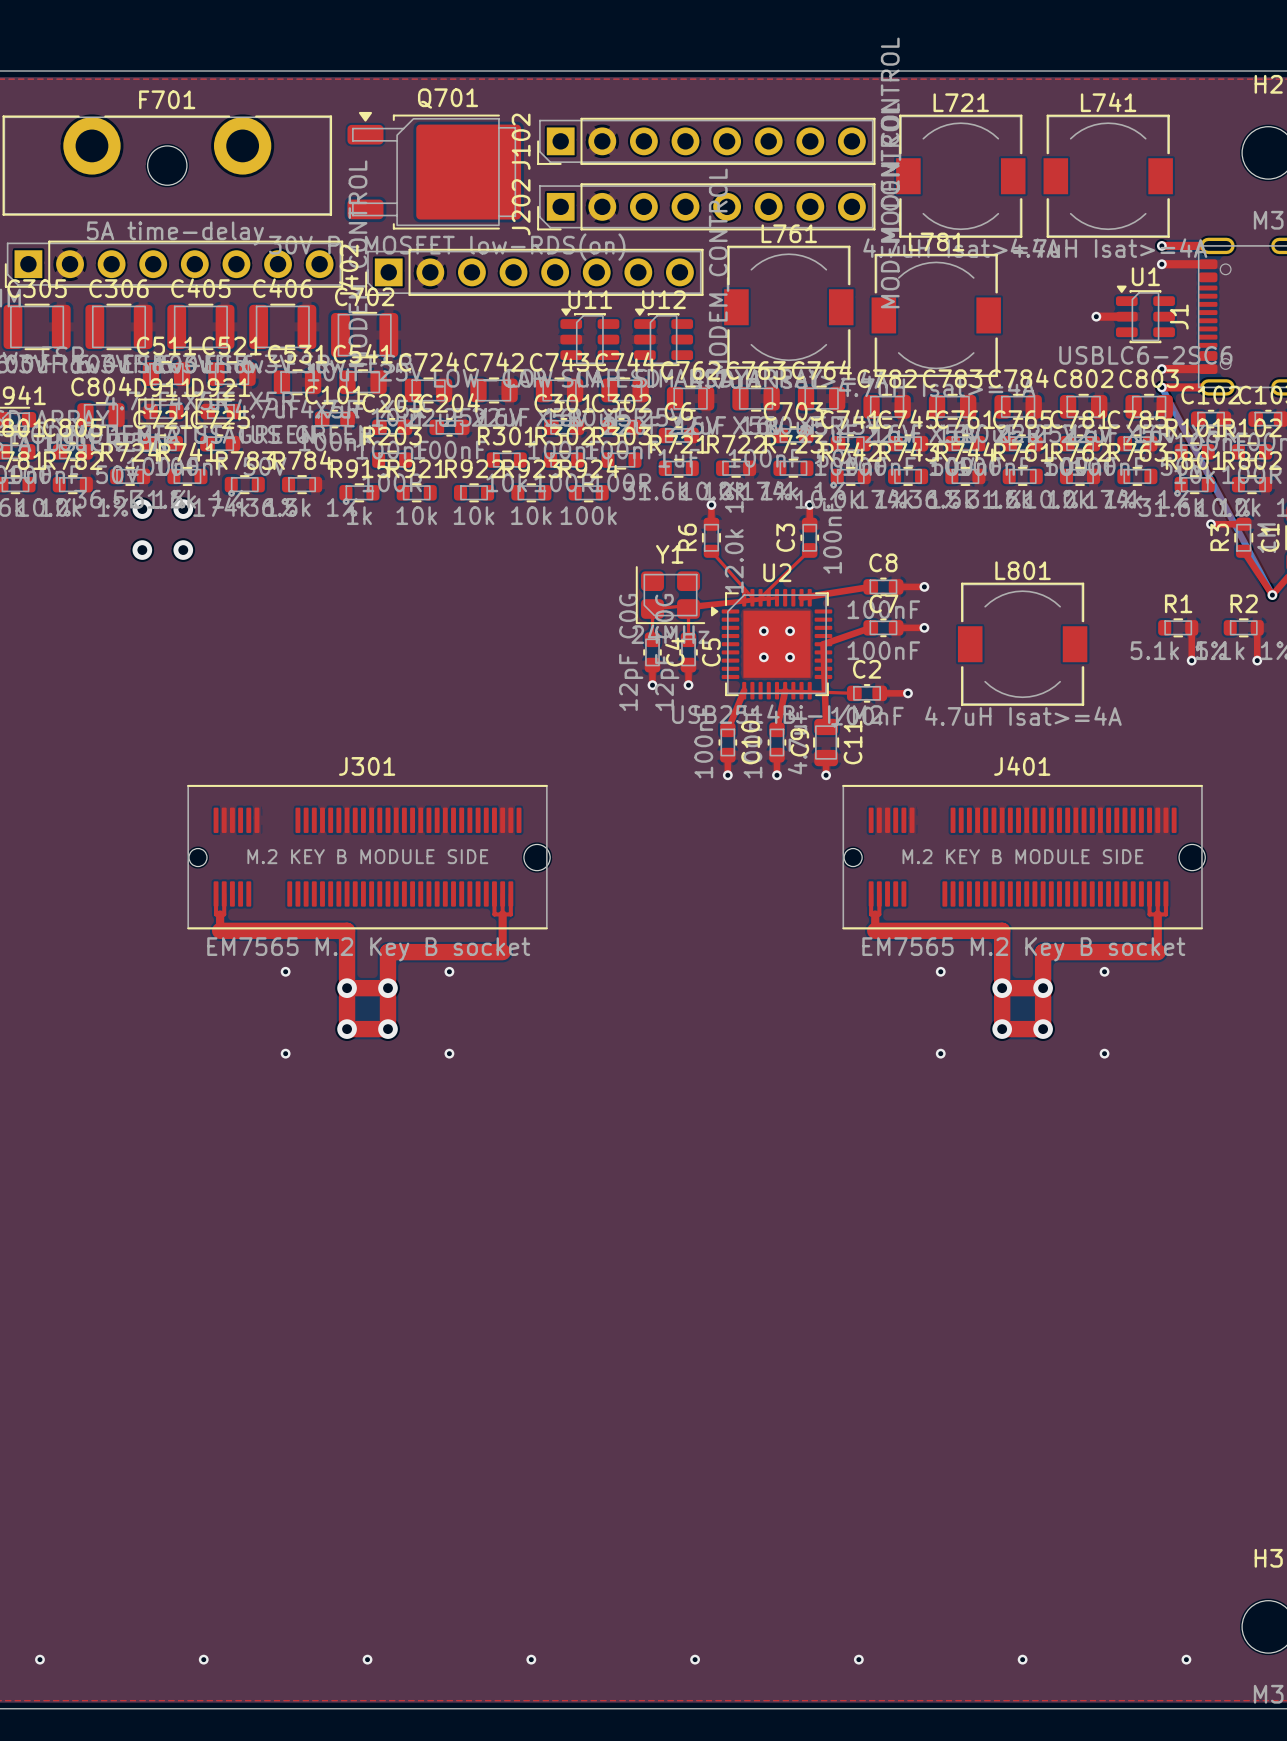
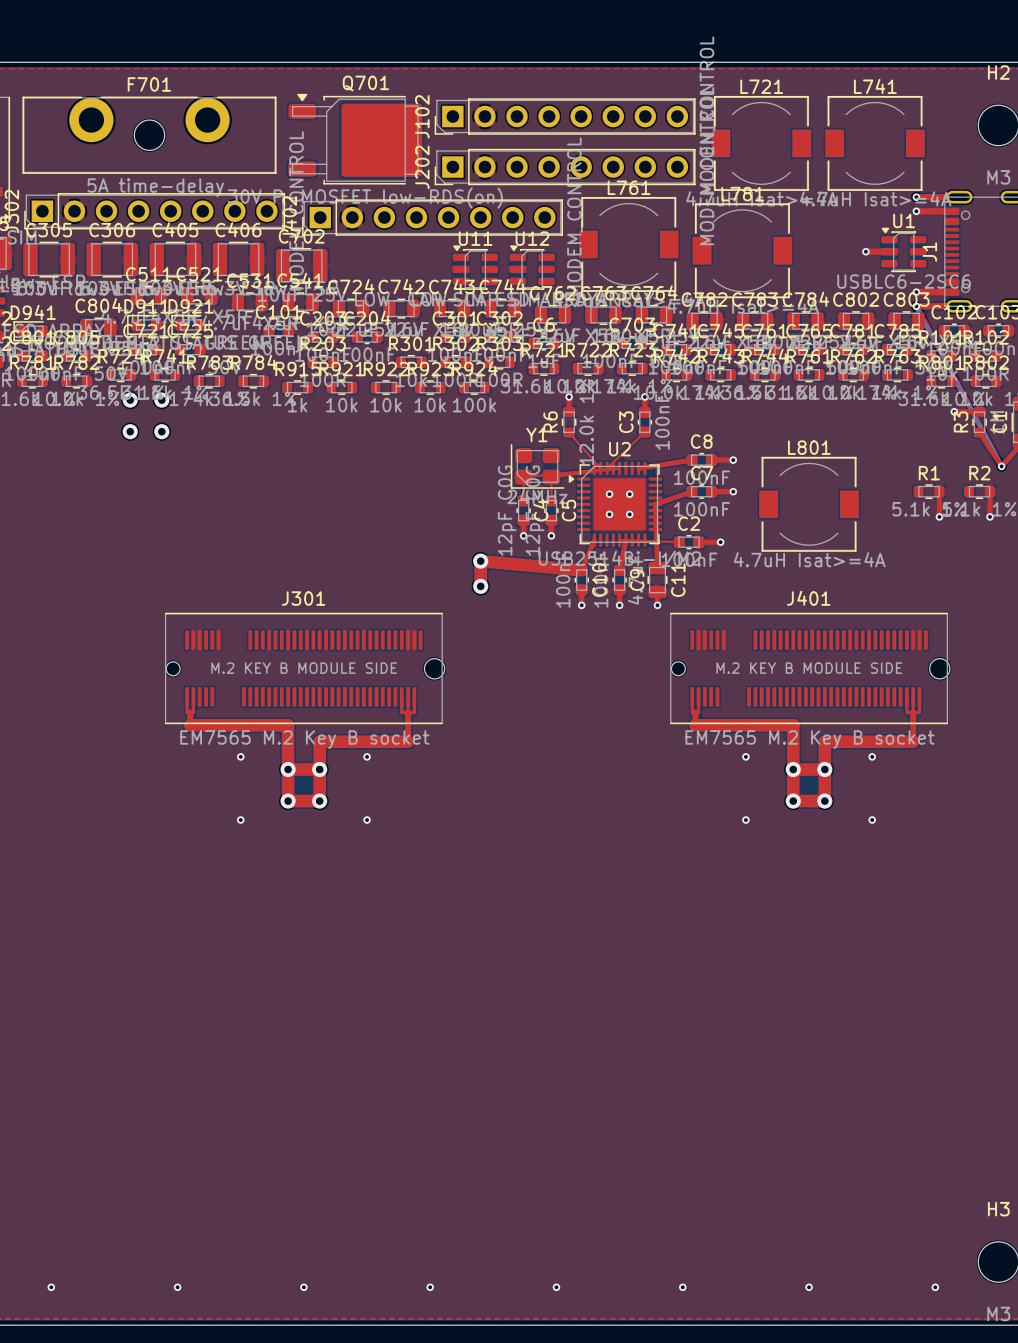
via: none -> (480, 561)
top track: none -> (581, 570) (480, 561) (480, 586)
via: none -> (480, 586)

